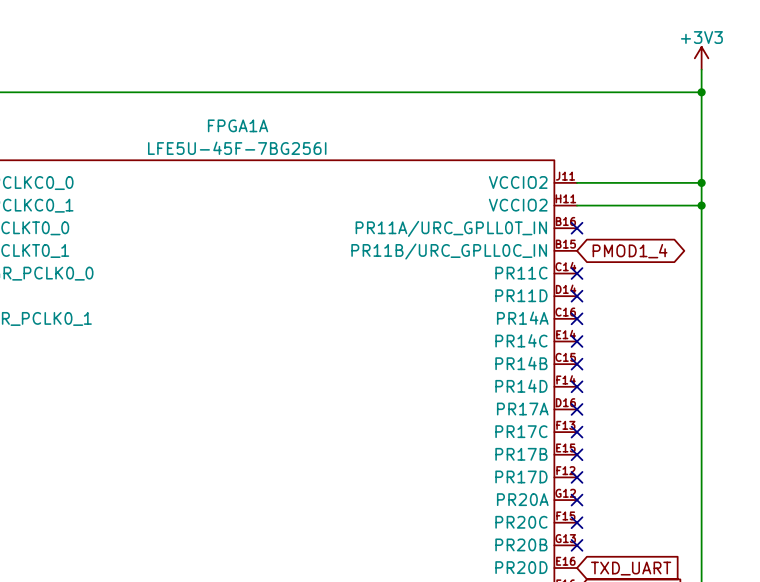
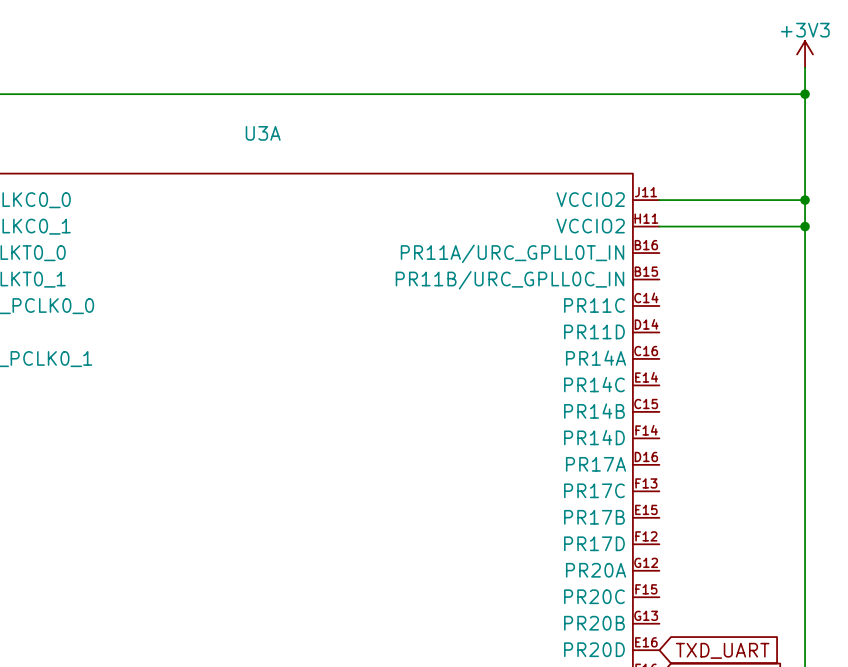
FPGA1A name: FPGA1A (238, 125) -> U3A (263, 133)
FPGA1A value: LFE5U-45F-7BG256I (237, 148) -> none
no-connect mark: (577, 228) -> none
global label: PMOD1_4 (630, 251) -> none
no-connect mark: (577, 273) -> none
no-connect mark: (577, 296) -> none
no-connect mark: (577, 318) -> none
no-connect mark: (577, 341) -> none
no-connect mark: (577, 364) -> none
no-connect mark: (577, 386) -> none
no-connect mark: (577, 409) -> none
no-connect mark: (577, 432) -> none
no-connect mark: (577, 454) -> none
no-connect mark: (577, 477) -> none
no-connect mark: (577, 500) -> none
no-connect mark: (577, 522) -> none
no-connect mark: (577, 545) -> none

